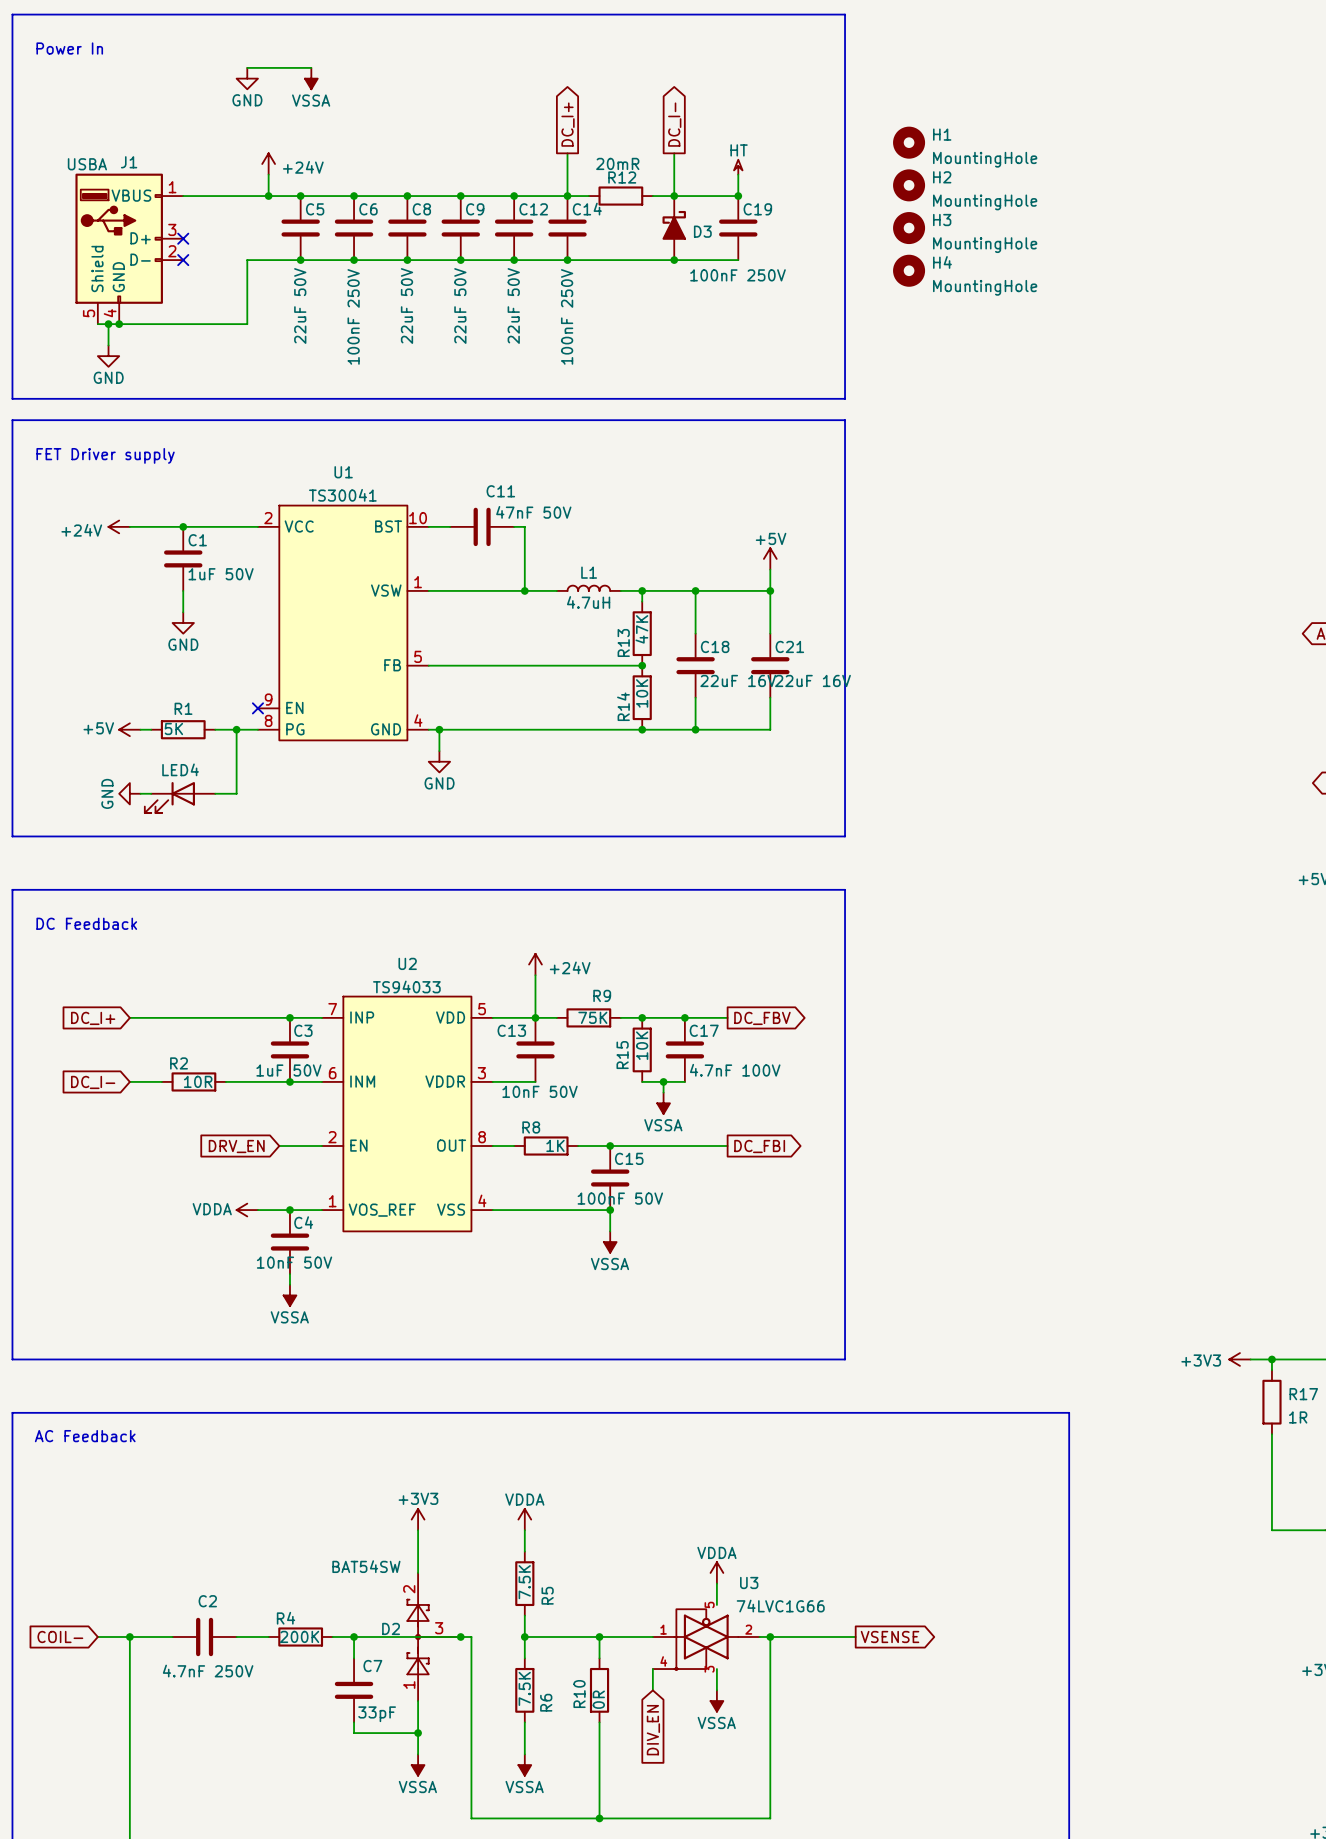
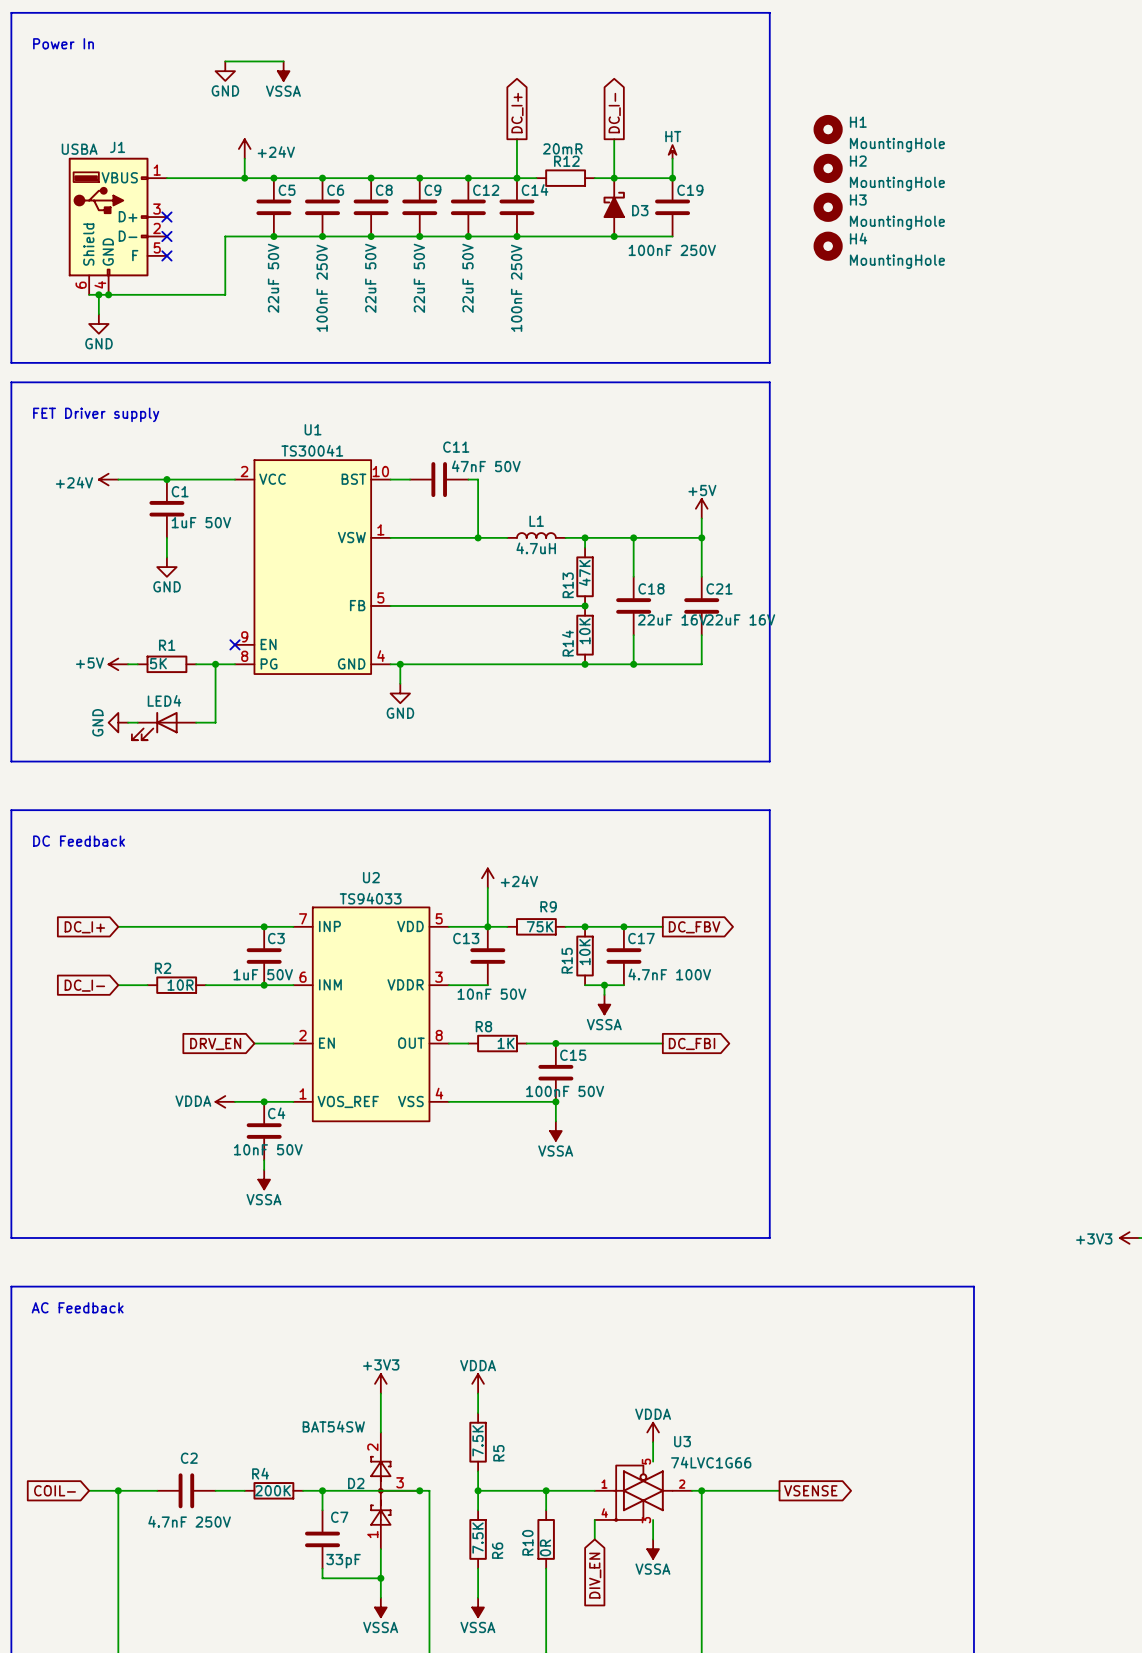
J1 symbol: [75, 173, 184, 325] -> [68, 157, 167, 295]
no-connect mark: none -> (166, 255)

